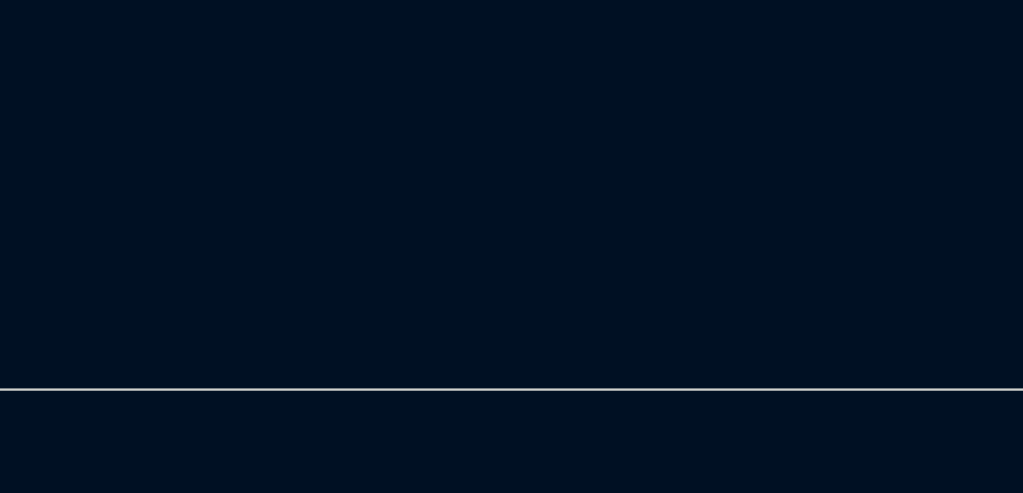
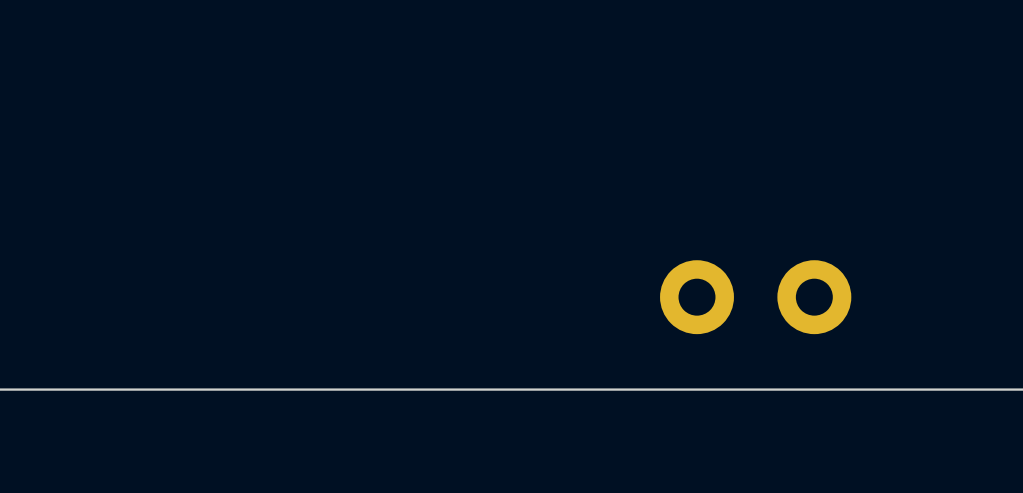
part: none -> (755, 297)

